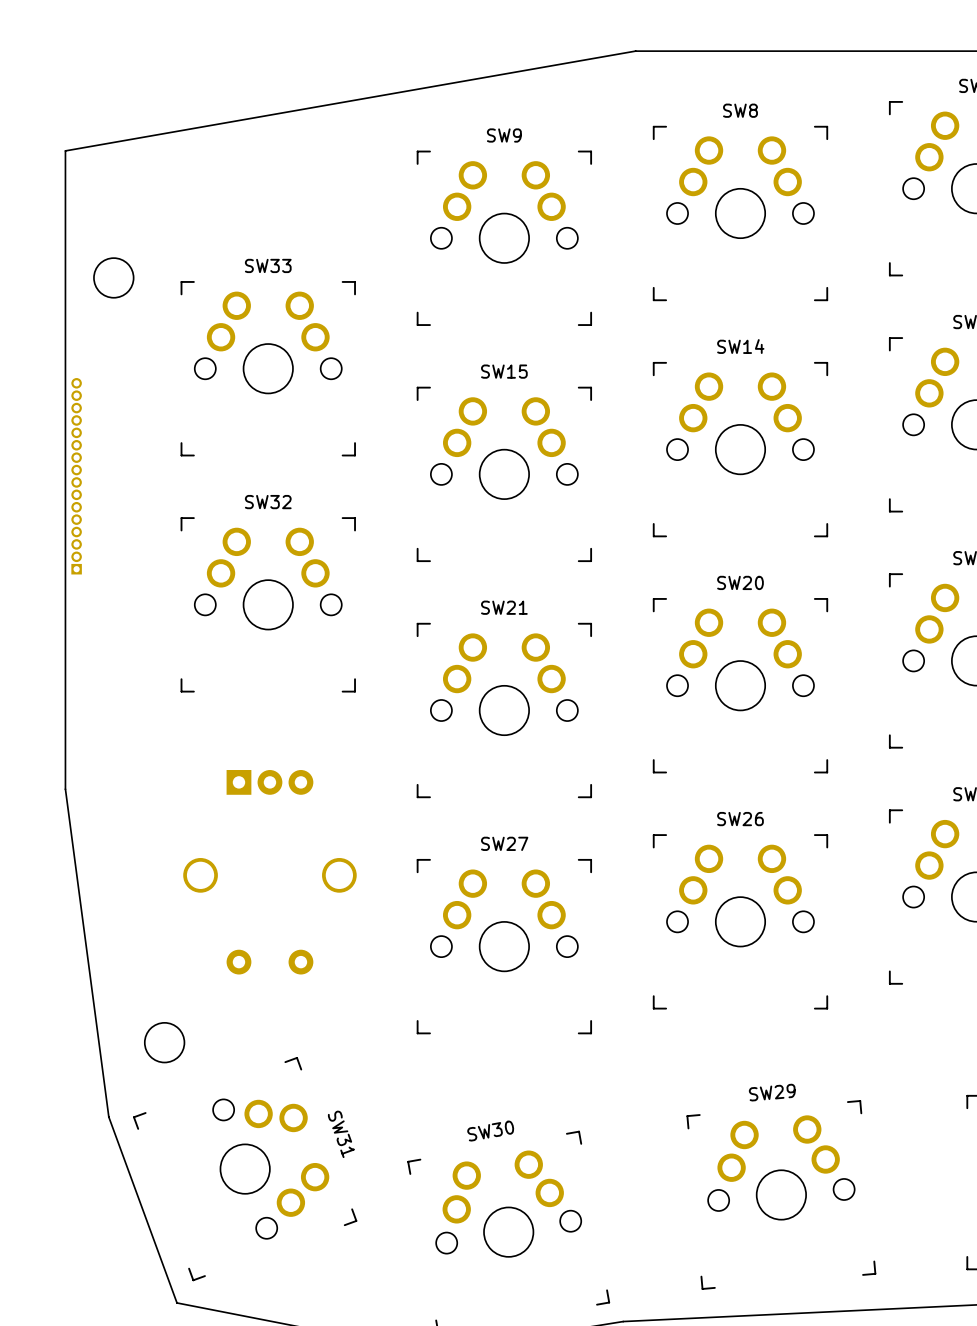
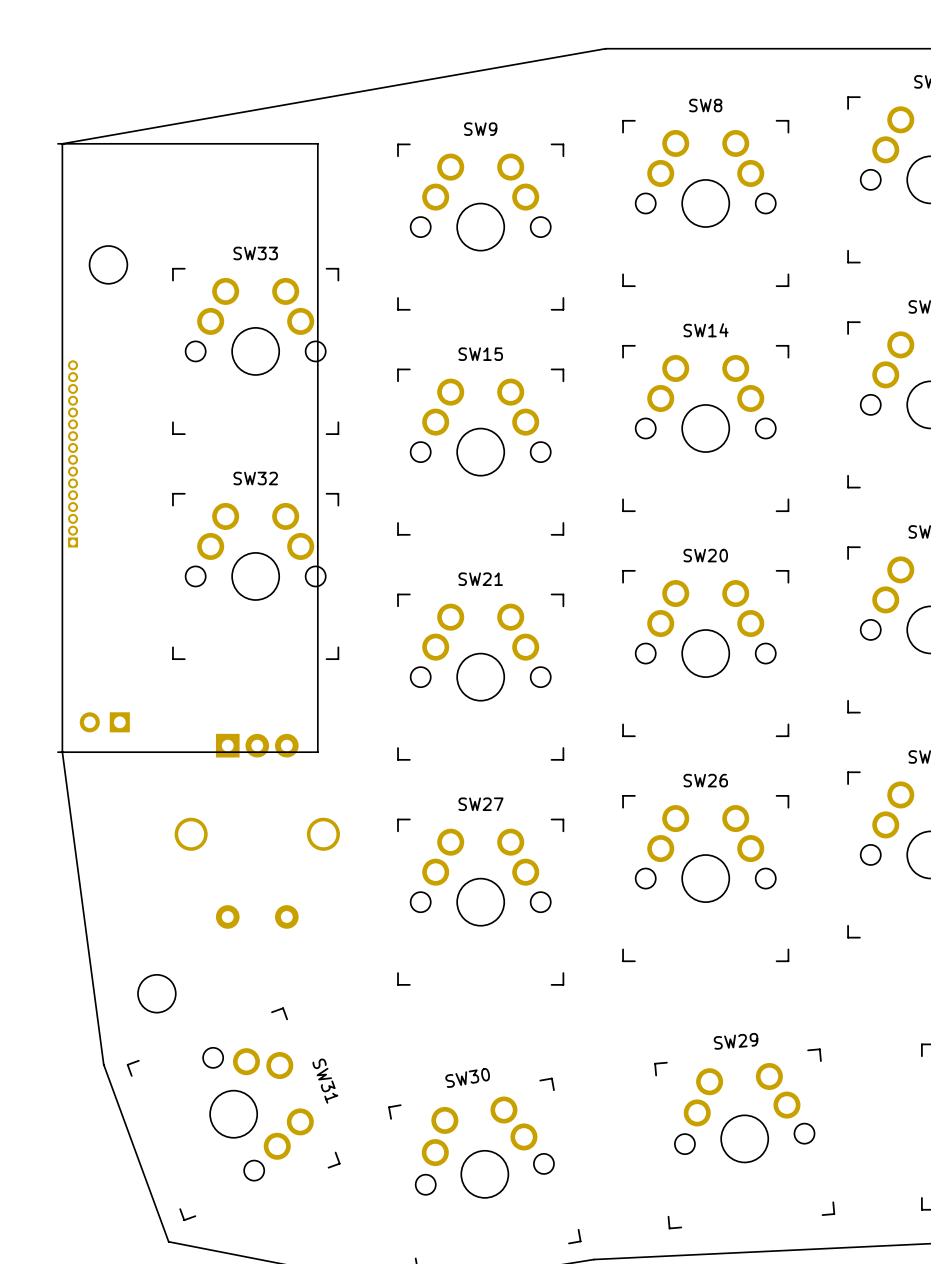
board edge: none -> (57, 143) (317, 143) (317, 752) (57, 752)
part: none -> (104, 722)

